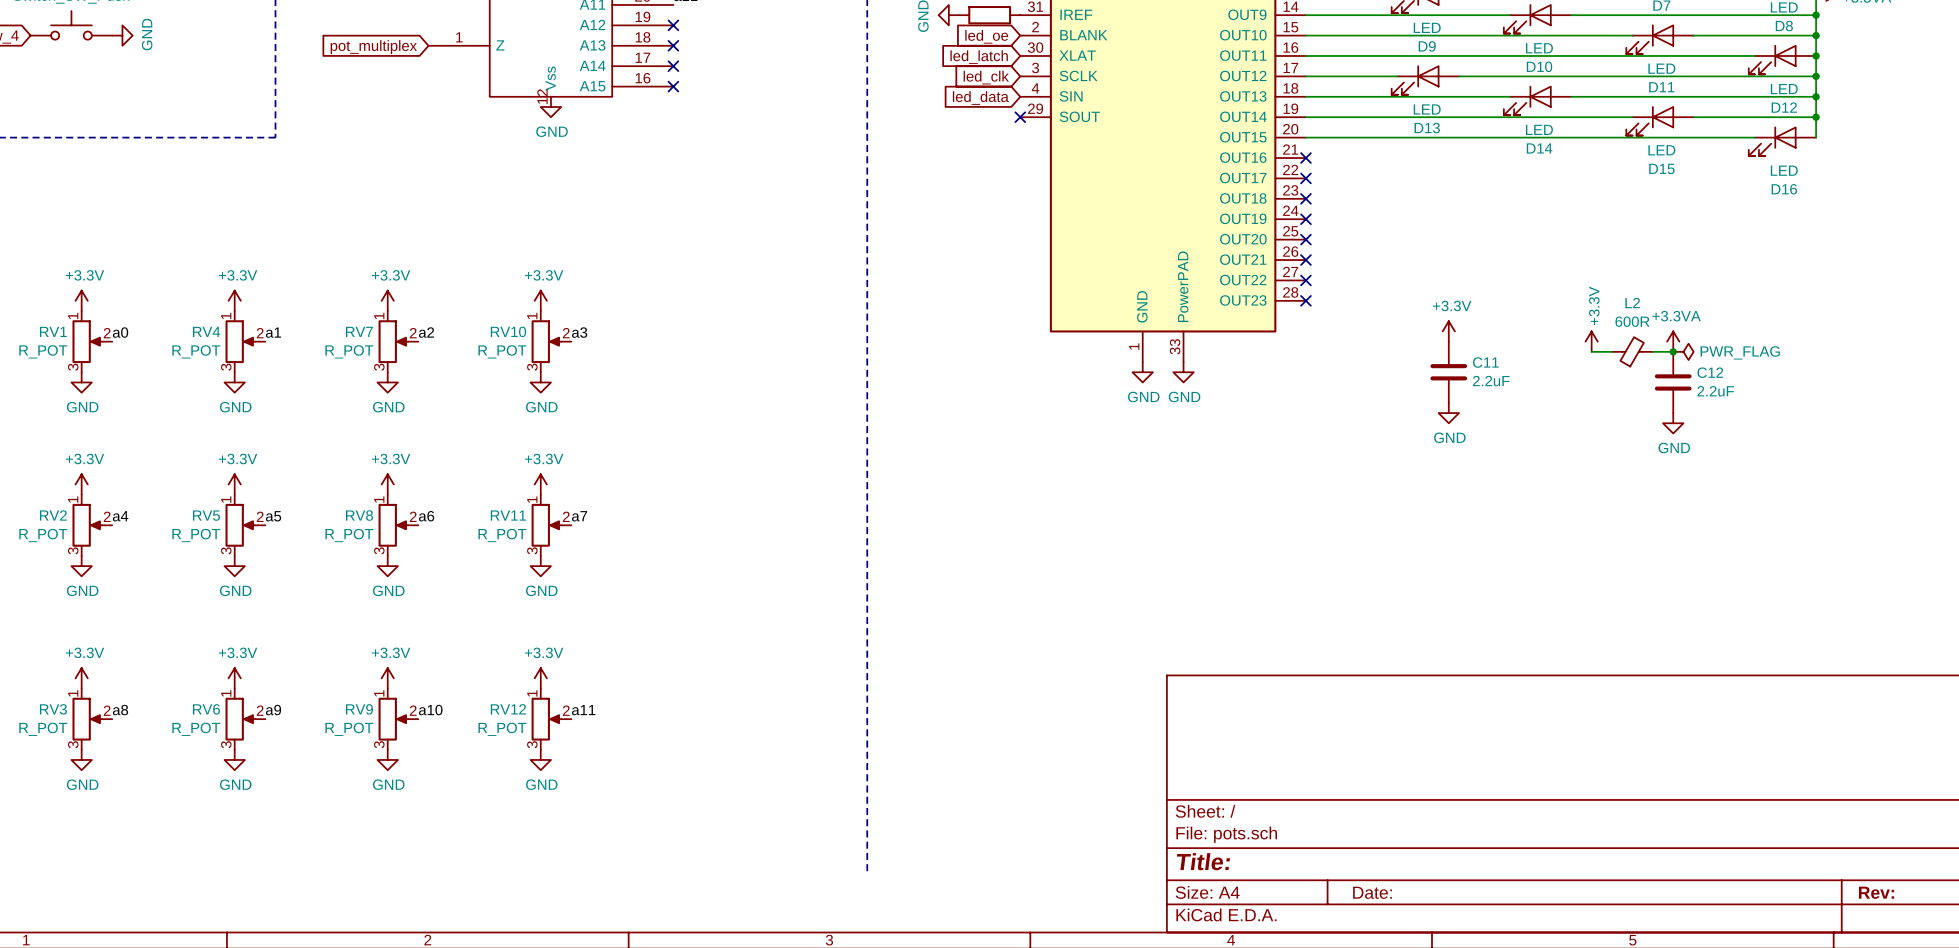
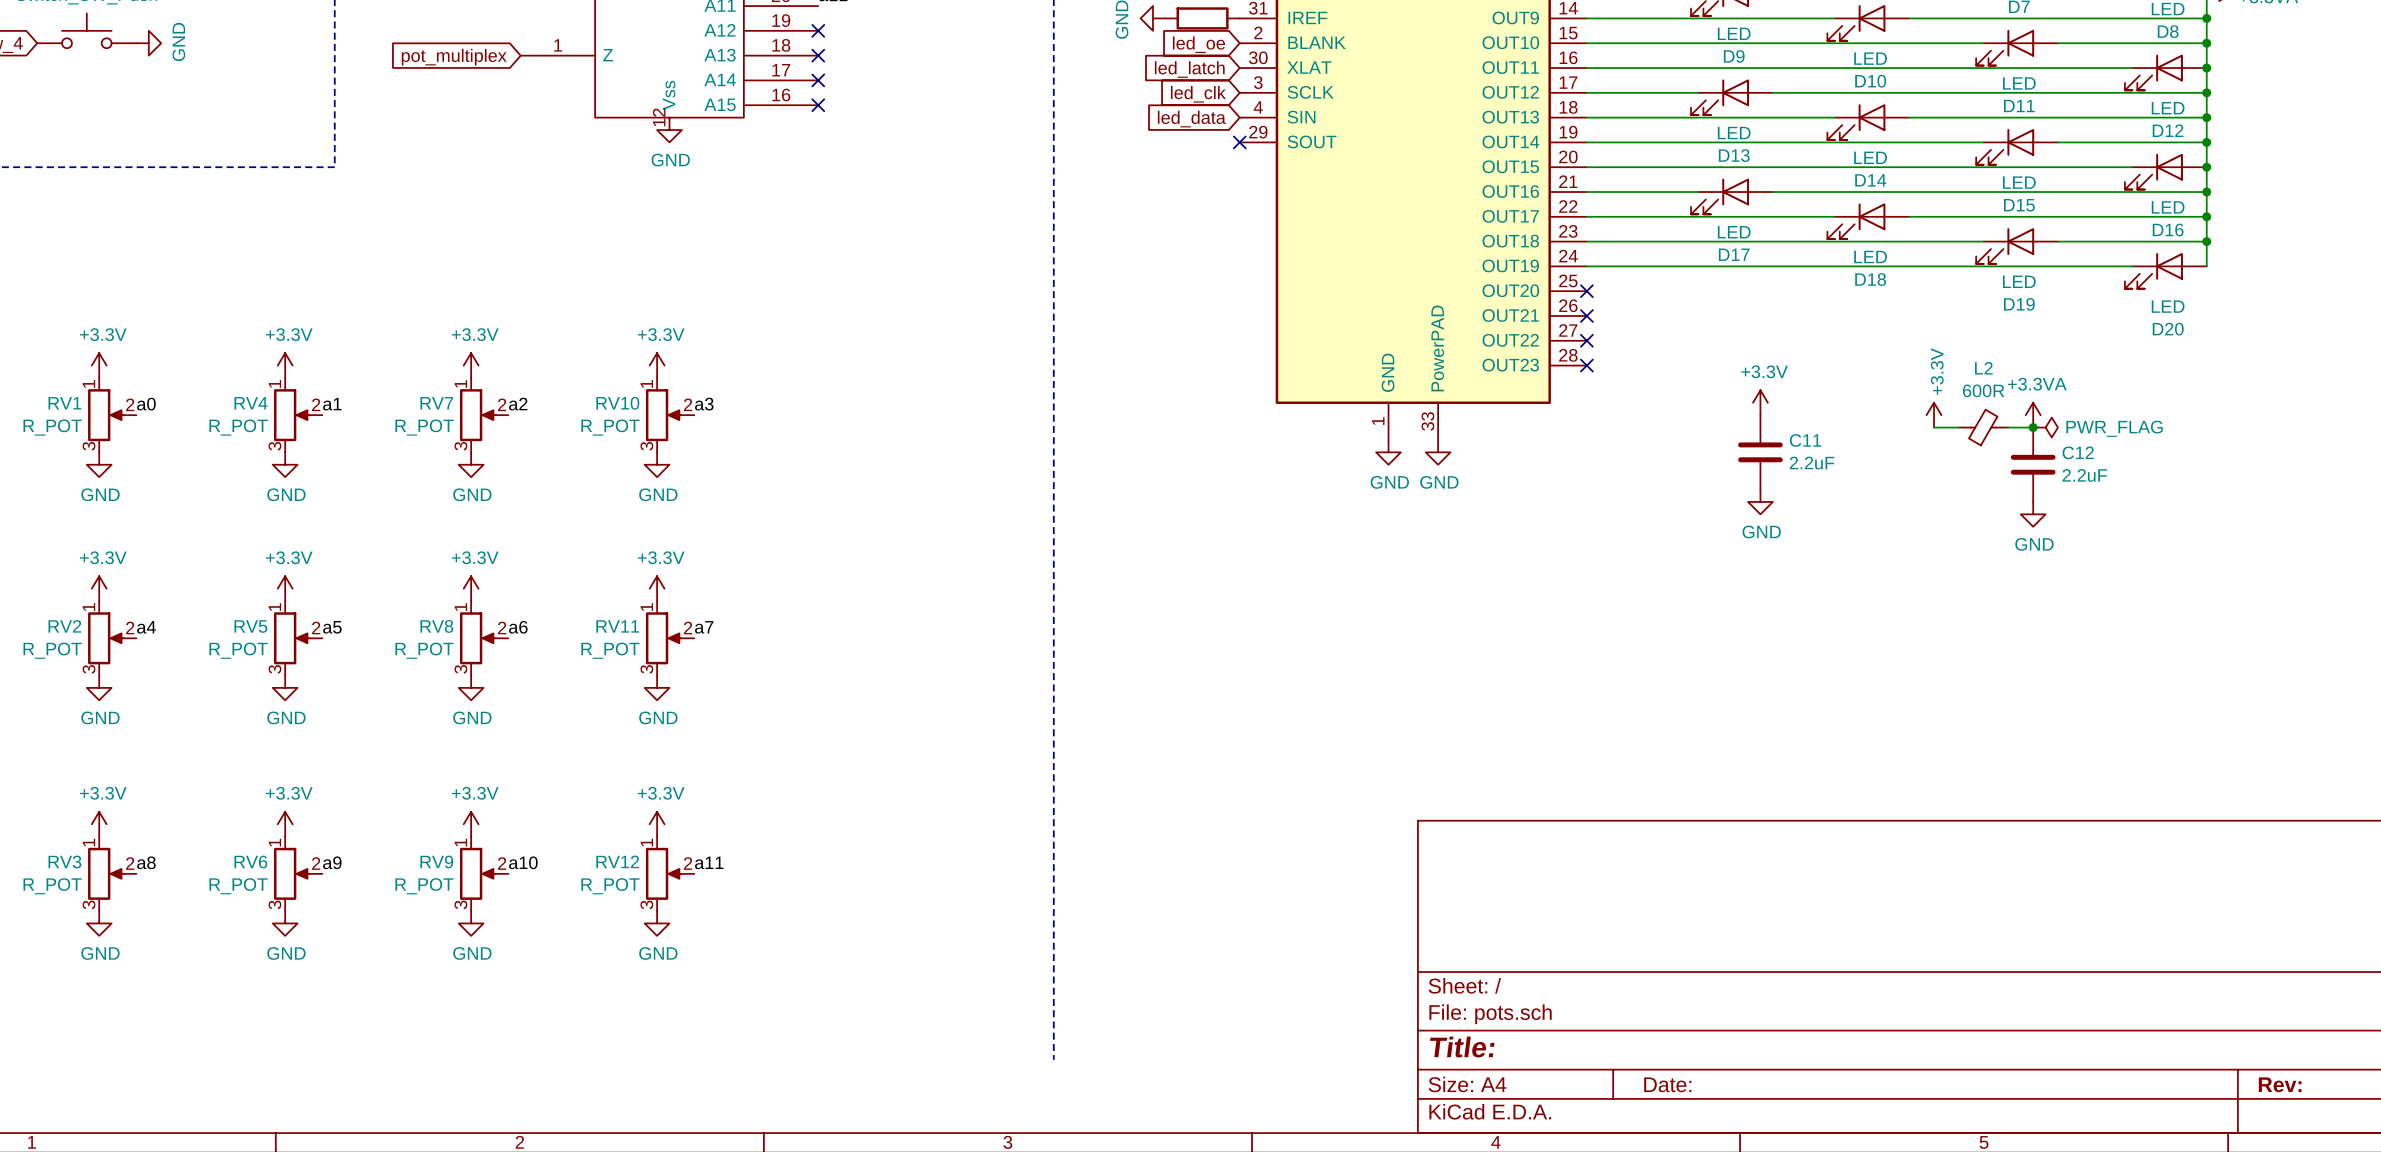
wire: none -> (2206, 167) (2206, 266)
junction: none -> (2206, 167)
wire: none -> (1586, 192) (1698, 192)
no-connect mark: (1305, 158) -> none
wire: none -> (1772, 192) (2206, 192)
junction: none -> (2206, 192)
D17: none -> LED (1731, 196)
wire: none -> (1586, 216) (1834, 216)
no-connect mark: (1305, 178) -> none
wire: none -> (1909, 216) (2206, 216)
junction: none -> (2206, 216)
D18: none -> LED (1868, 221)
wire: none -> (1586, 241) (1983, 241)
no-connect mark: (1305, 198) -> none
wire: none -> (2057, 241) (2206, 241)
junction: none -> (2206, 241)
D19: none -> LED (2017, 246)
wire: none -> (1586, 266) (2132, 266)
no-connect mark: (1305, 219) -> none
D20: none -> LED (2165, 270)

